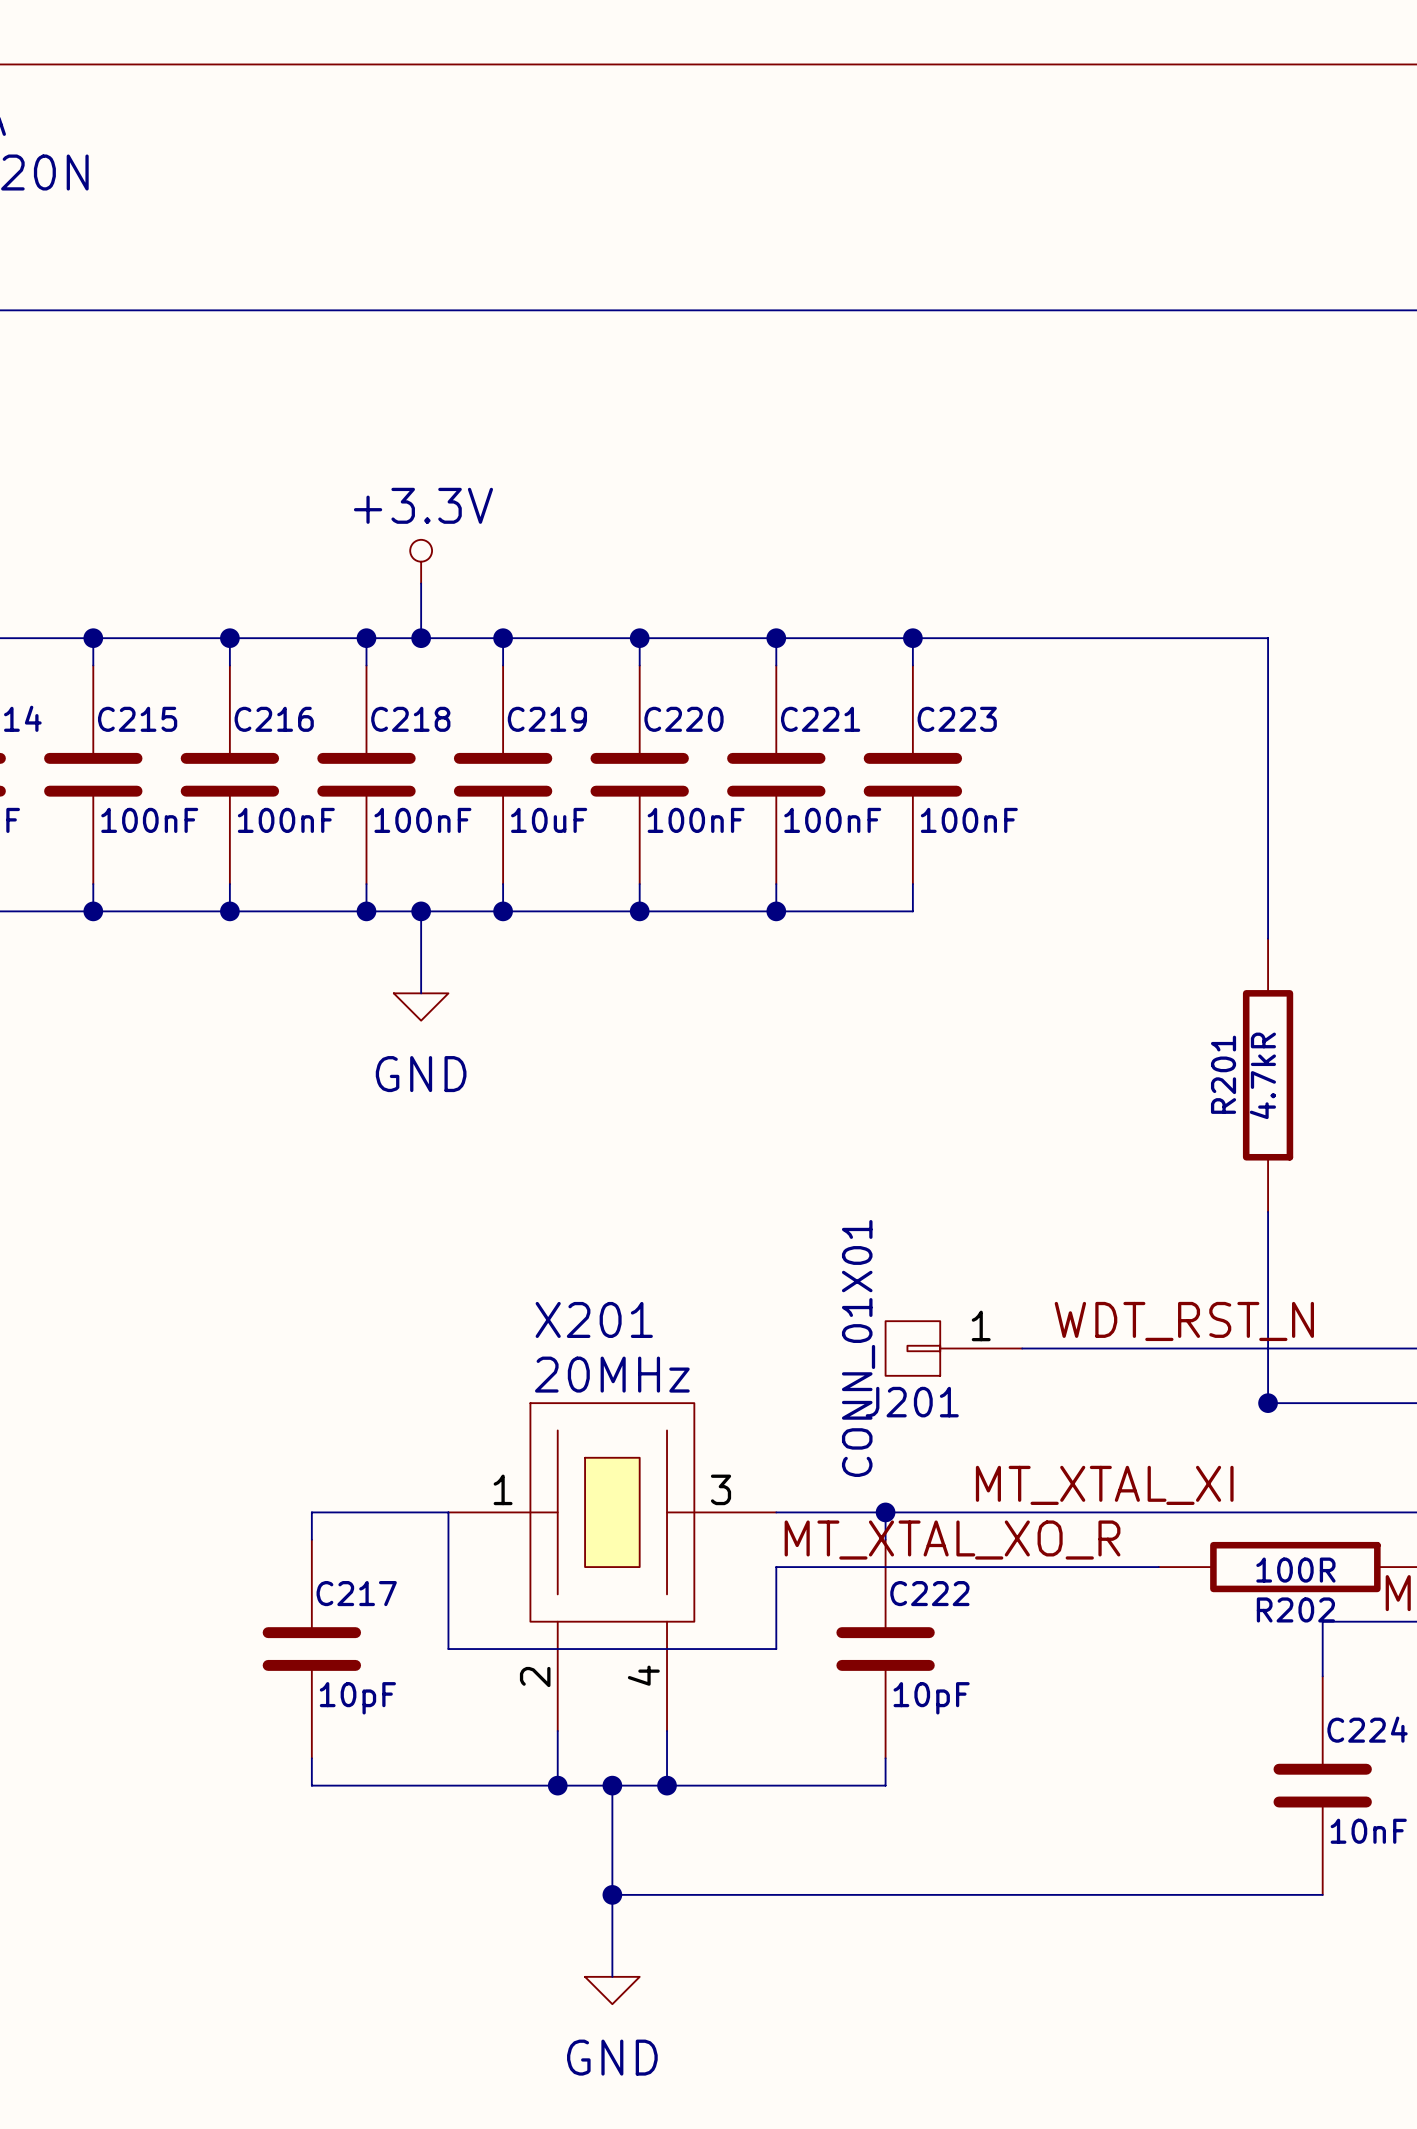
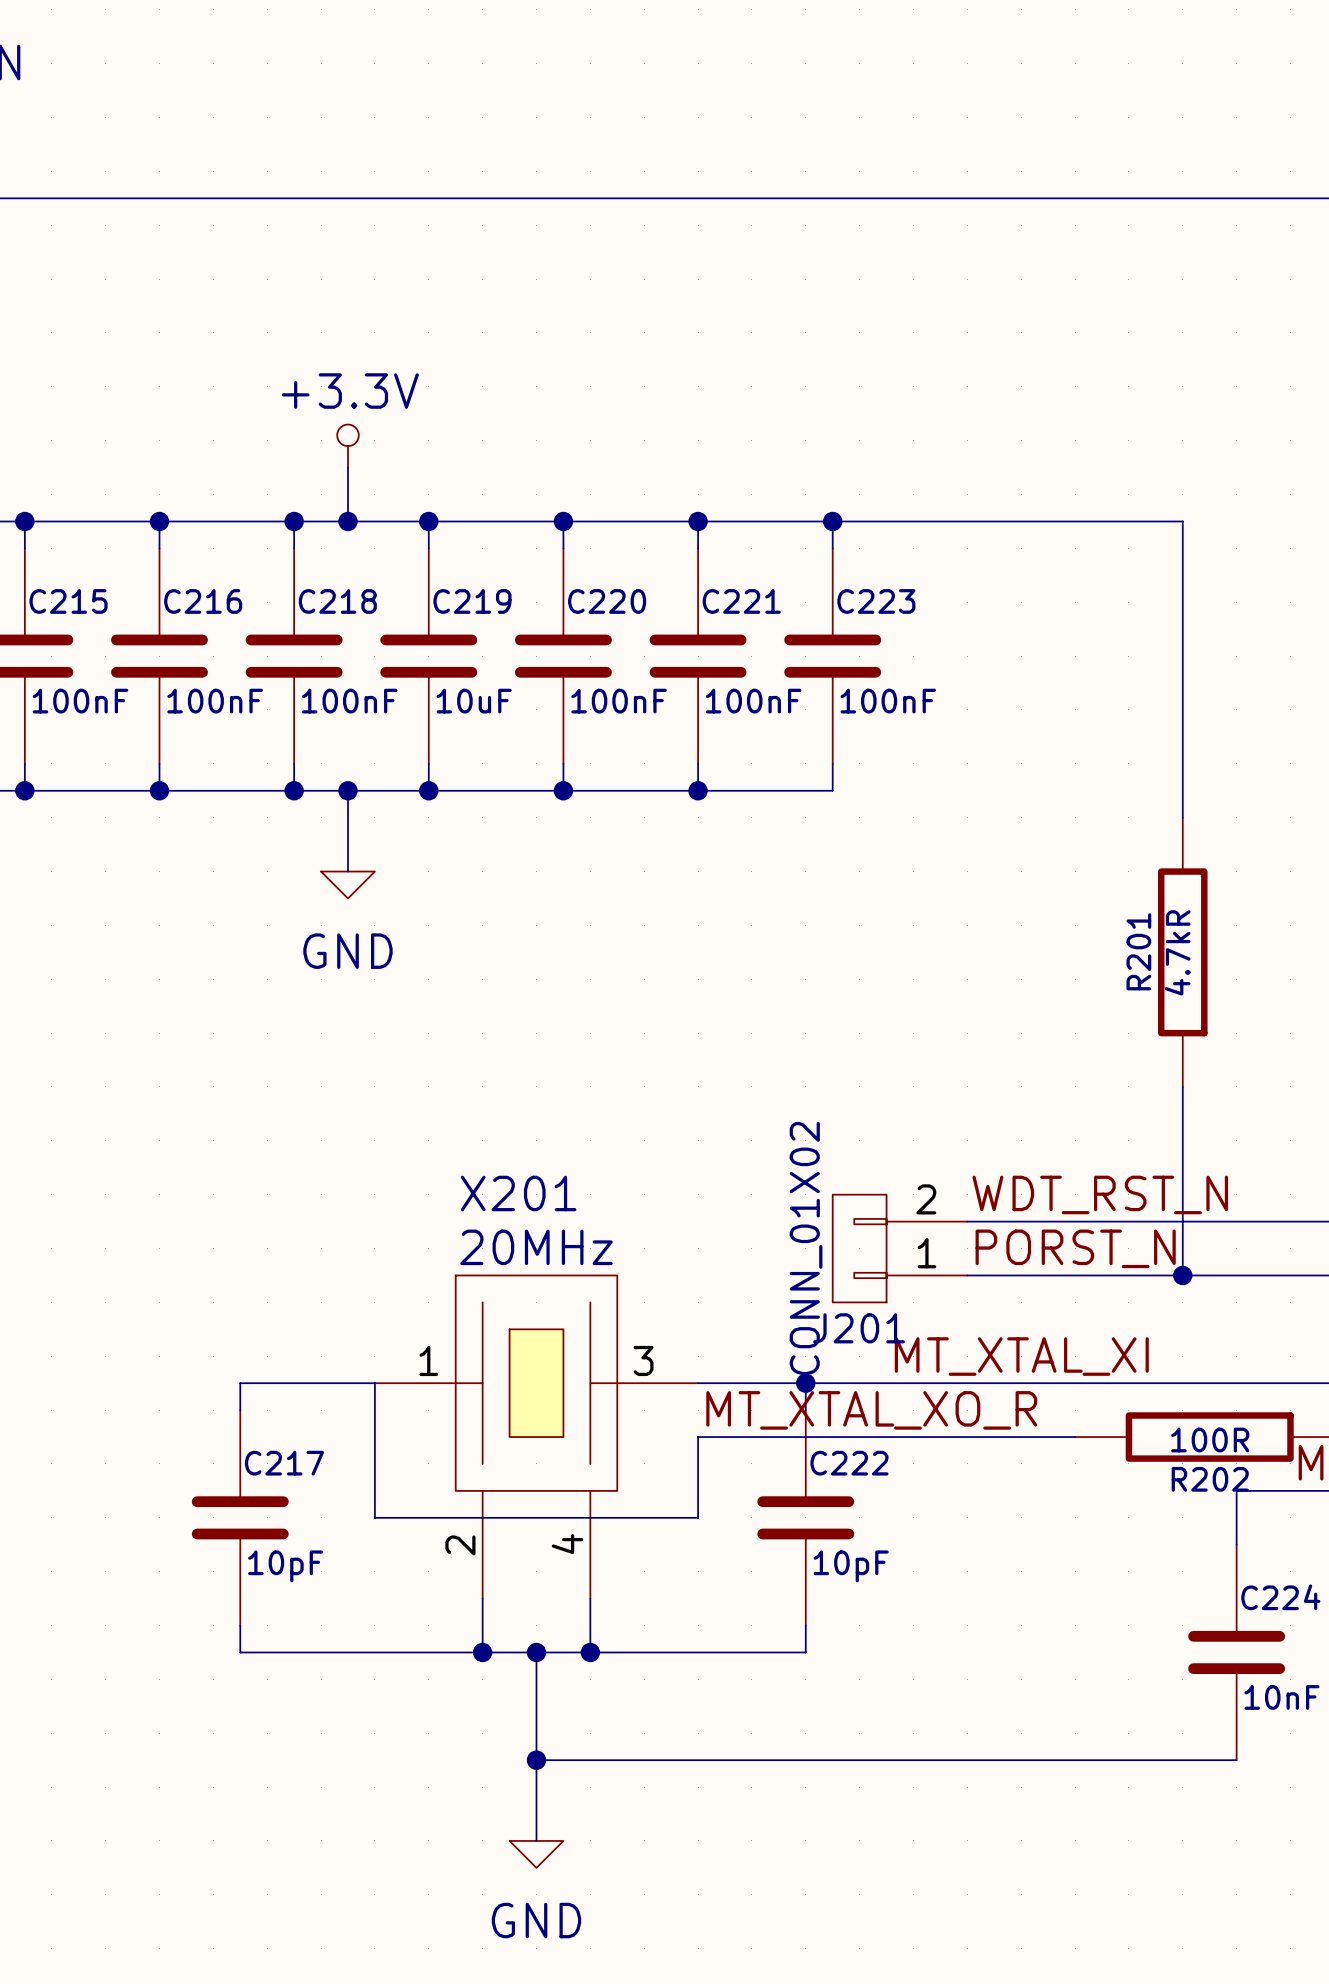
J201 symbol: [885, 1321, 1023, 1376] -> [832, 1194, 968, 1303]
J201 value: CONN_01X01 (858, 1348) -> CONN_01X02 (806, 1248)
label: none -> PORST_N (1075, 1248)
wire: none -> (967, 1275) (1182, 1275)

